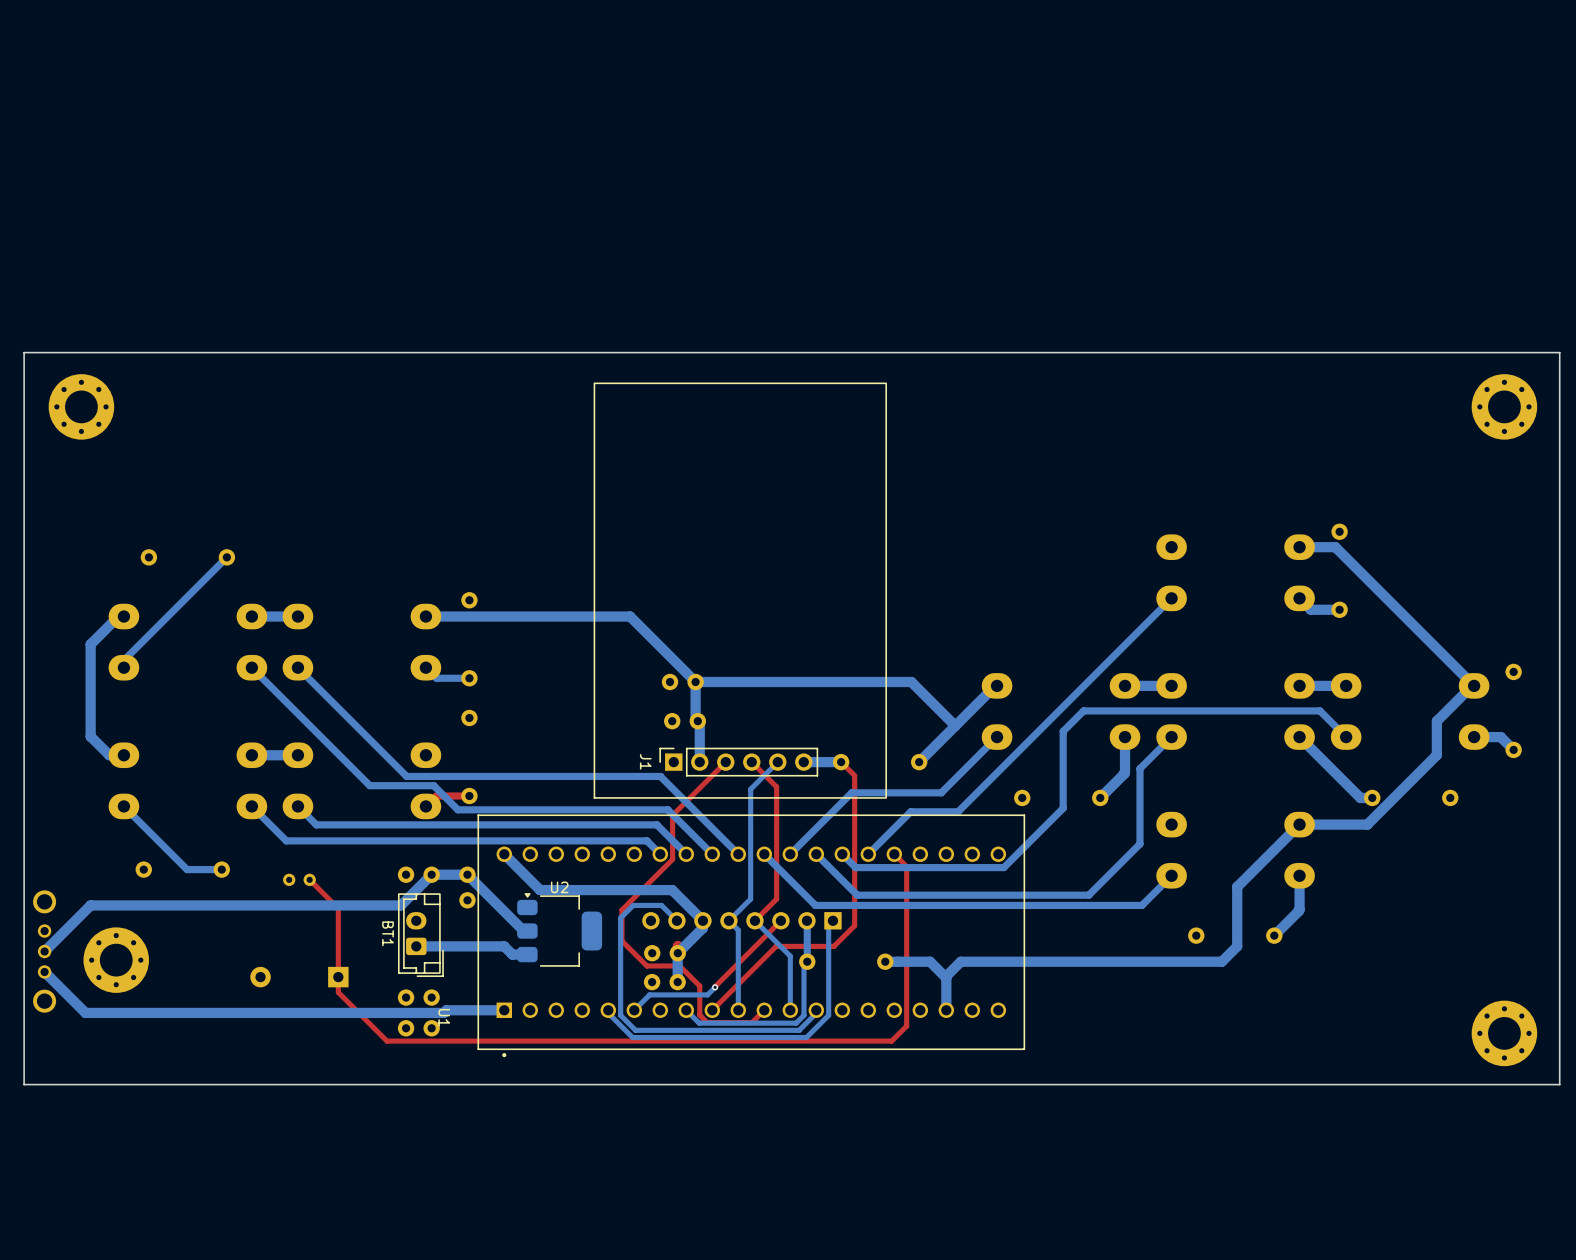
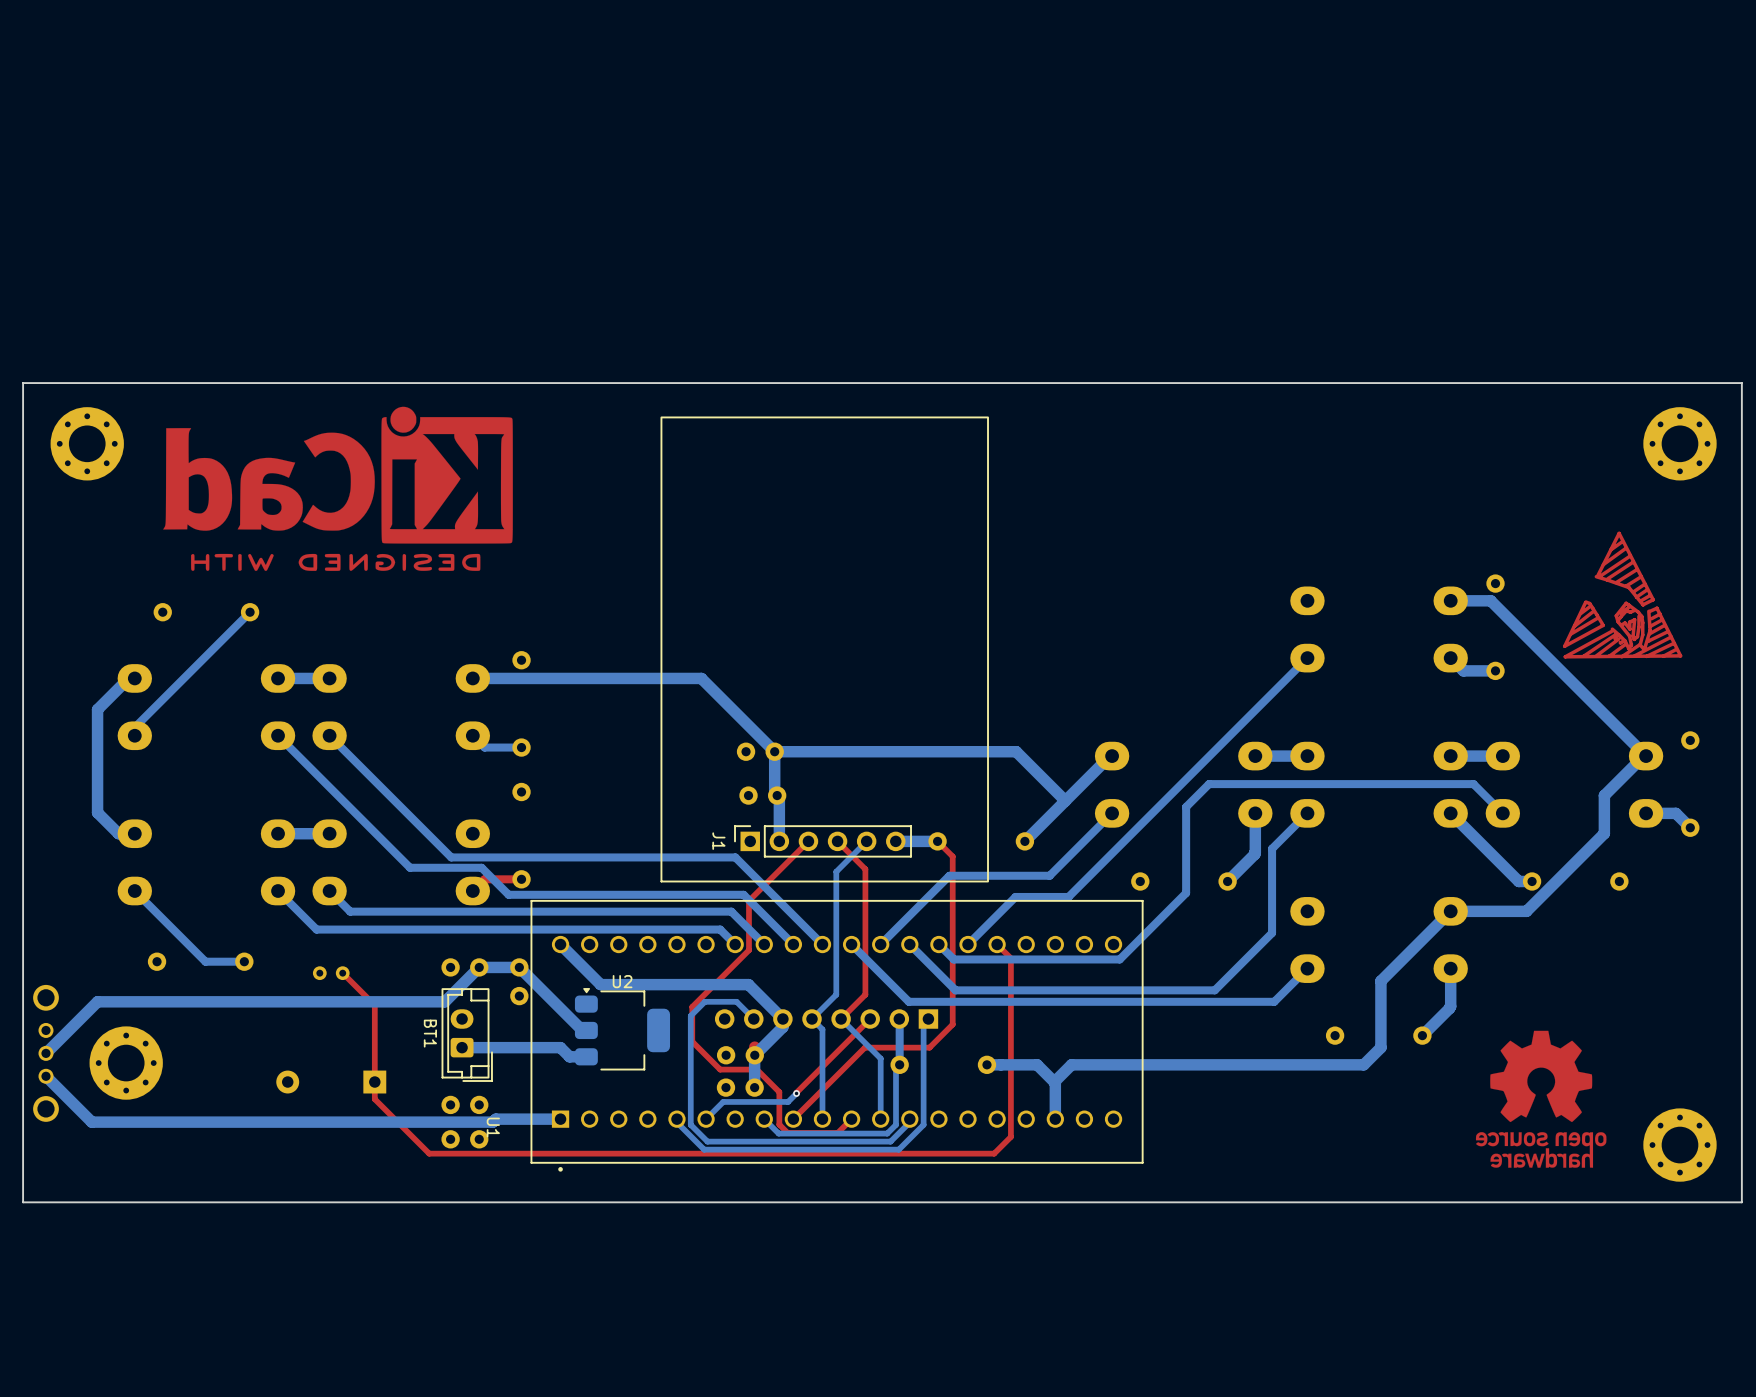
drawing: none -> [163, 406, 513, 571]
drawing: none -> [1562, 531, 1683, 659]
drawing: none -> [1475, 1030, 1607, 1168]

